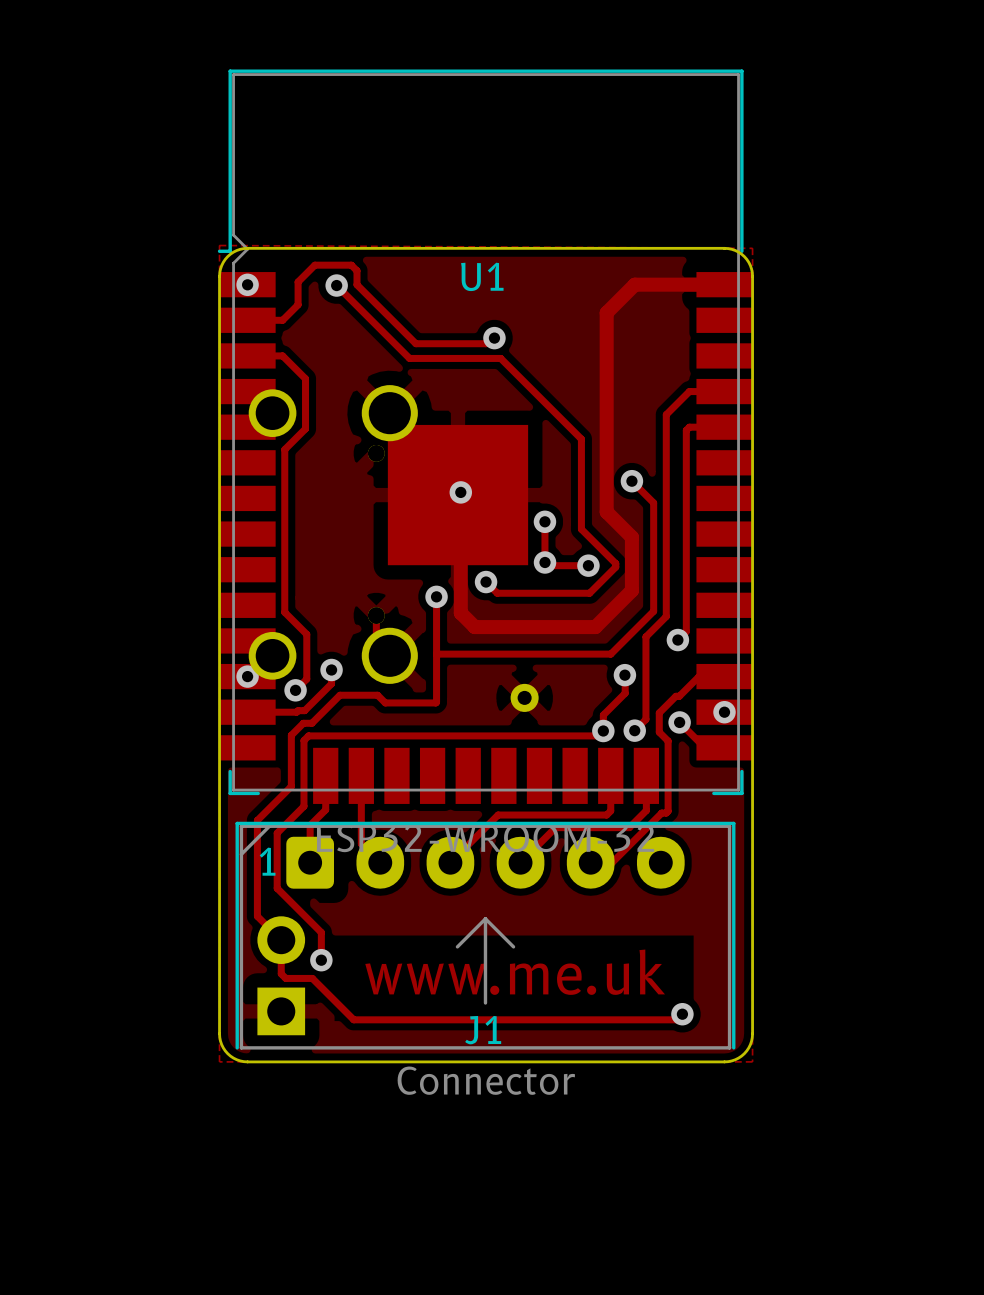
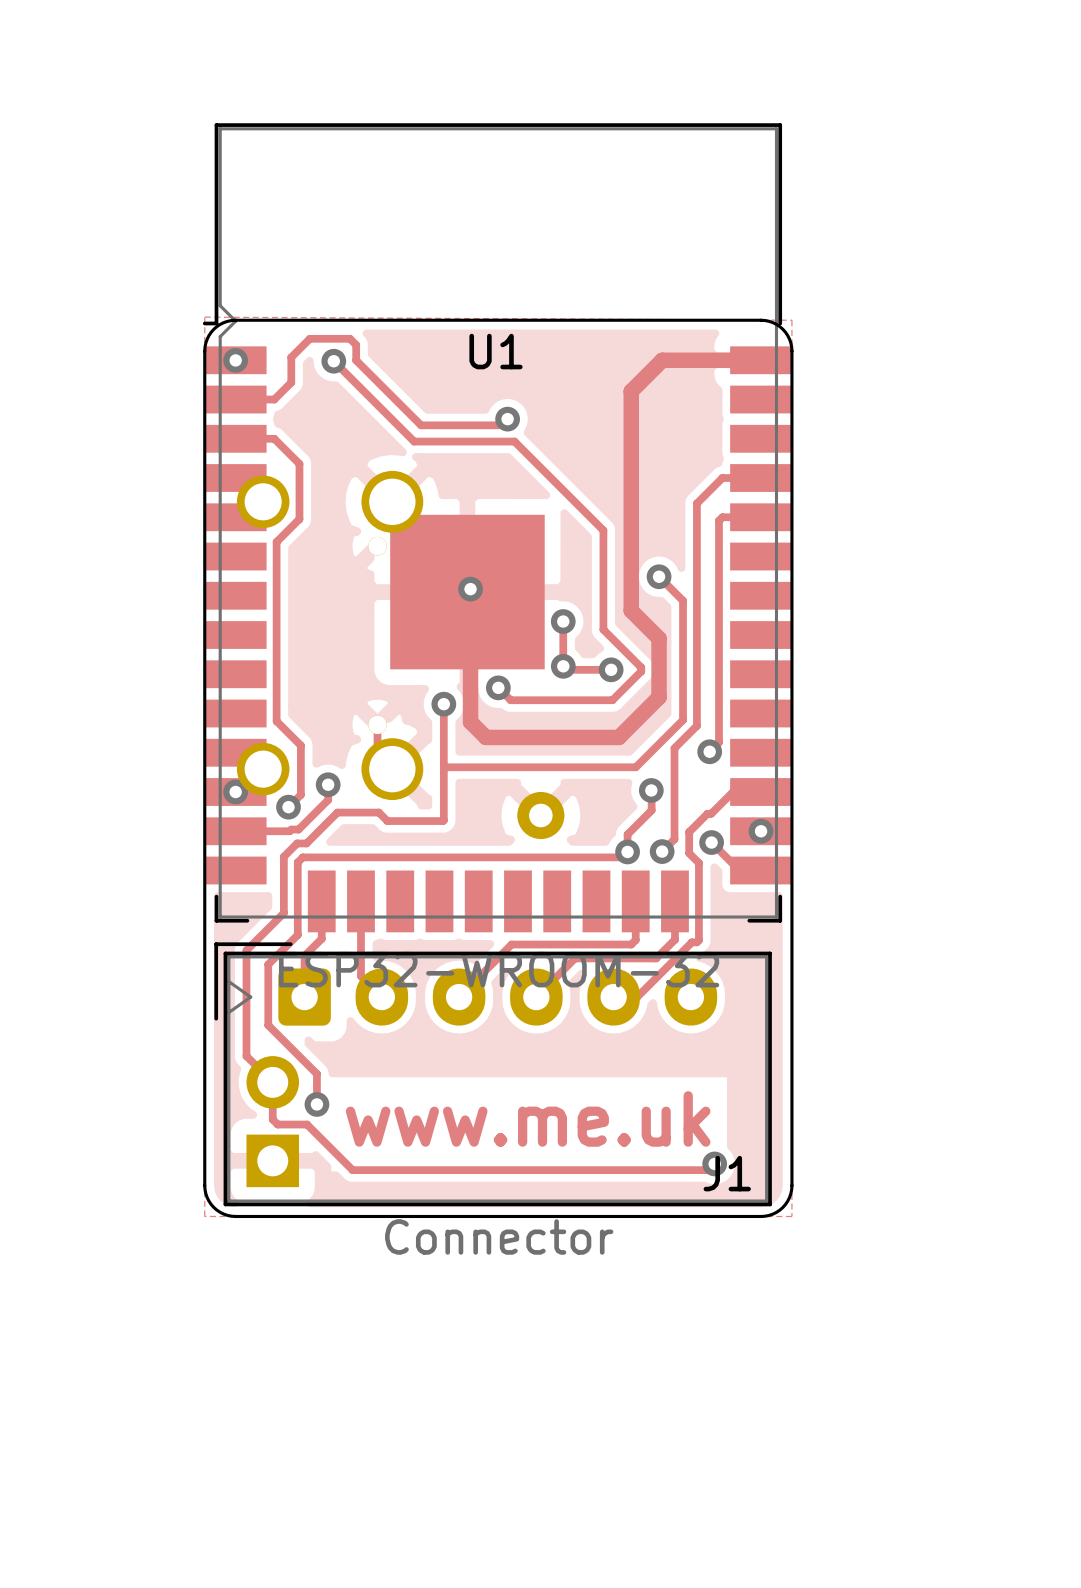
part footprint: [510, 683, 539, 712] -> [517, 791, 565, 840]
J1 footprint: [235, 821, 736, 1050] -> [214, 942, 772, 1207]
J1 name position: J1 (483, 1030) -> J1 (727, 1173)

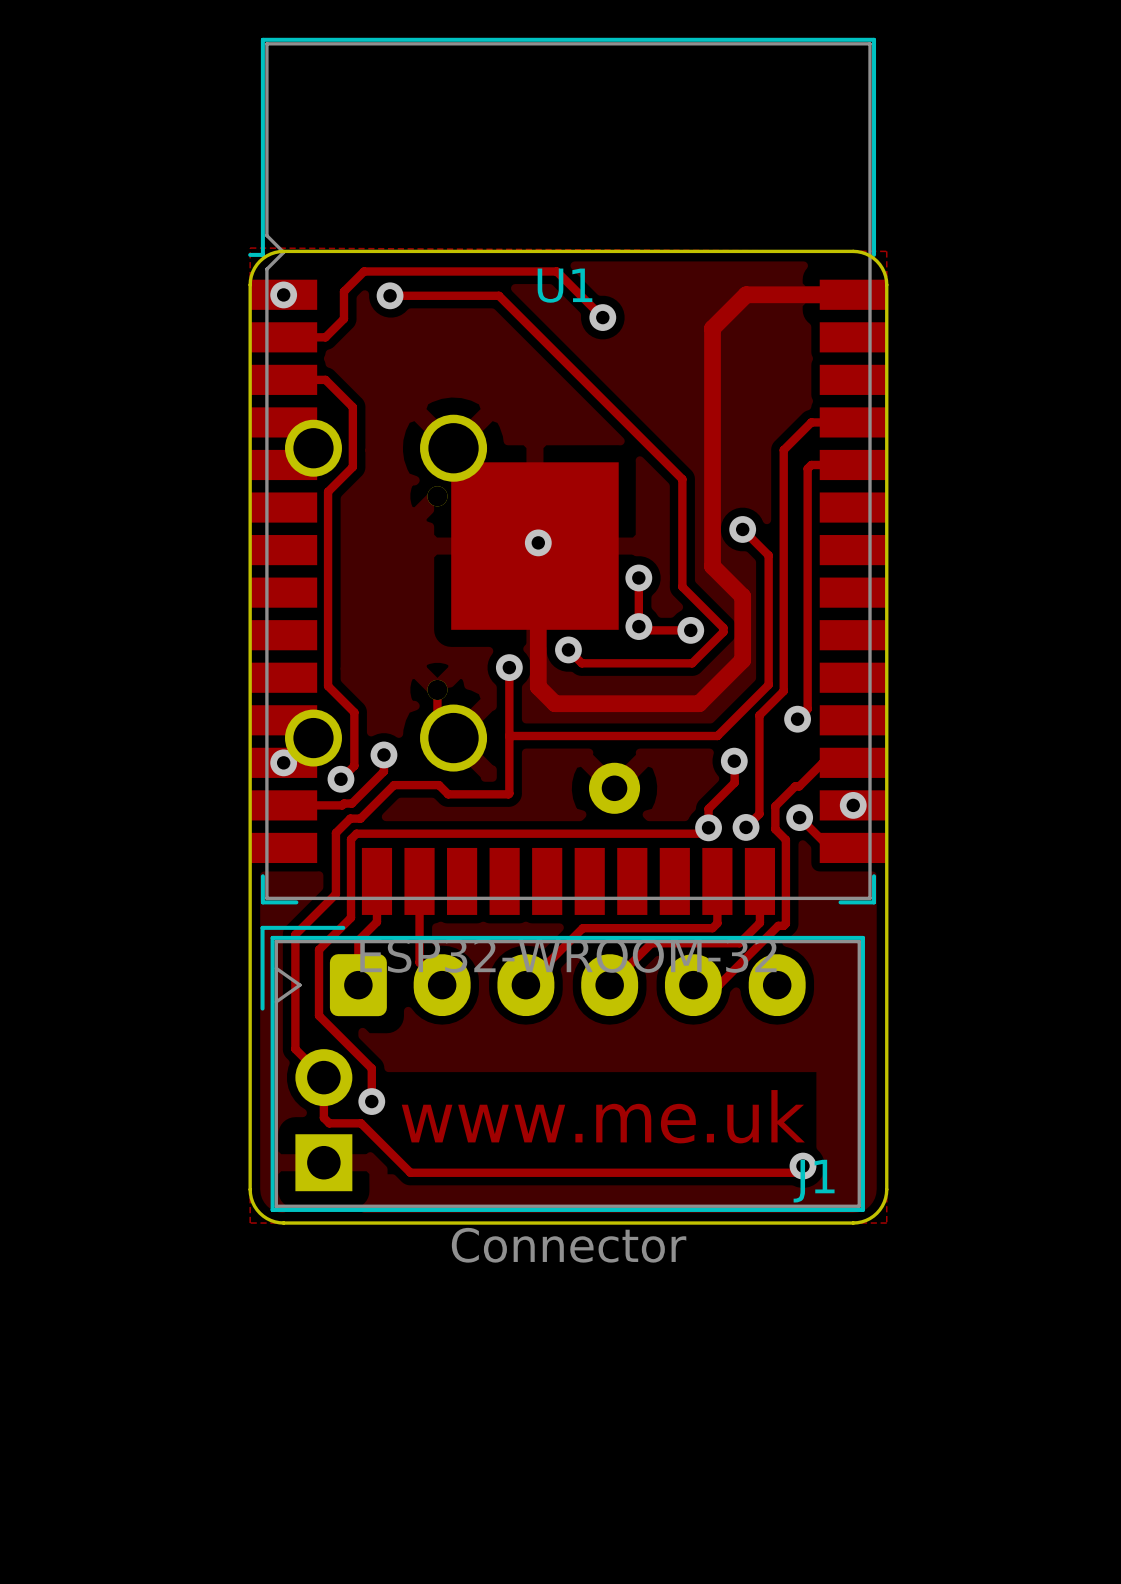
track: (350, 338) (356, 344) (356, 360) (421, 425) (498, 425) (504, 419) (507, 419) -> (407, 271) (556, 271) (602, 317)
track: (333, 361) (414, 441) (514, 441) -> (390, 295) (498, 295) (586, 382)
via position: (507, 419) -> (602, 317)

